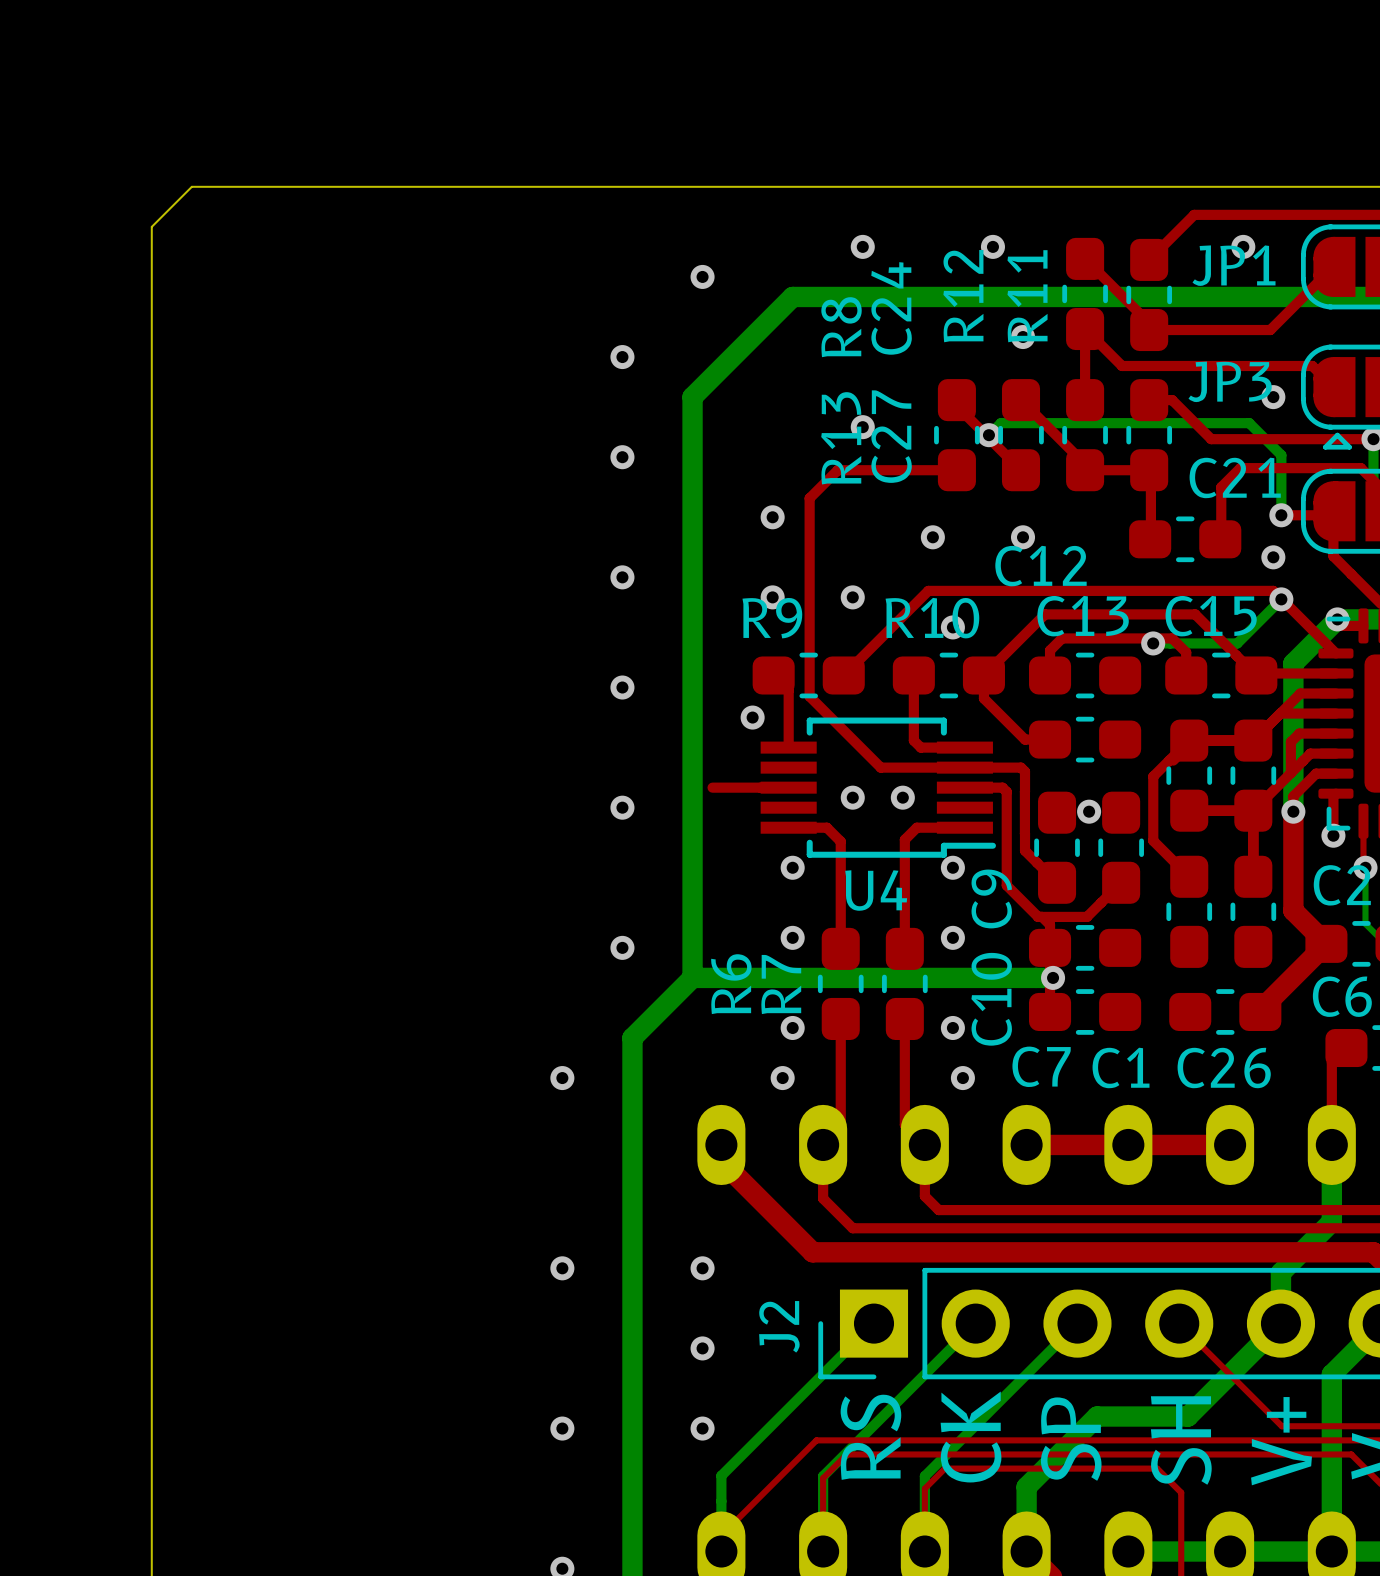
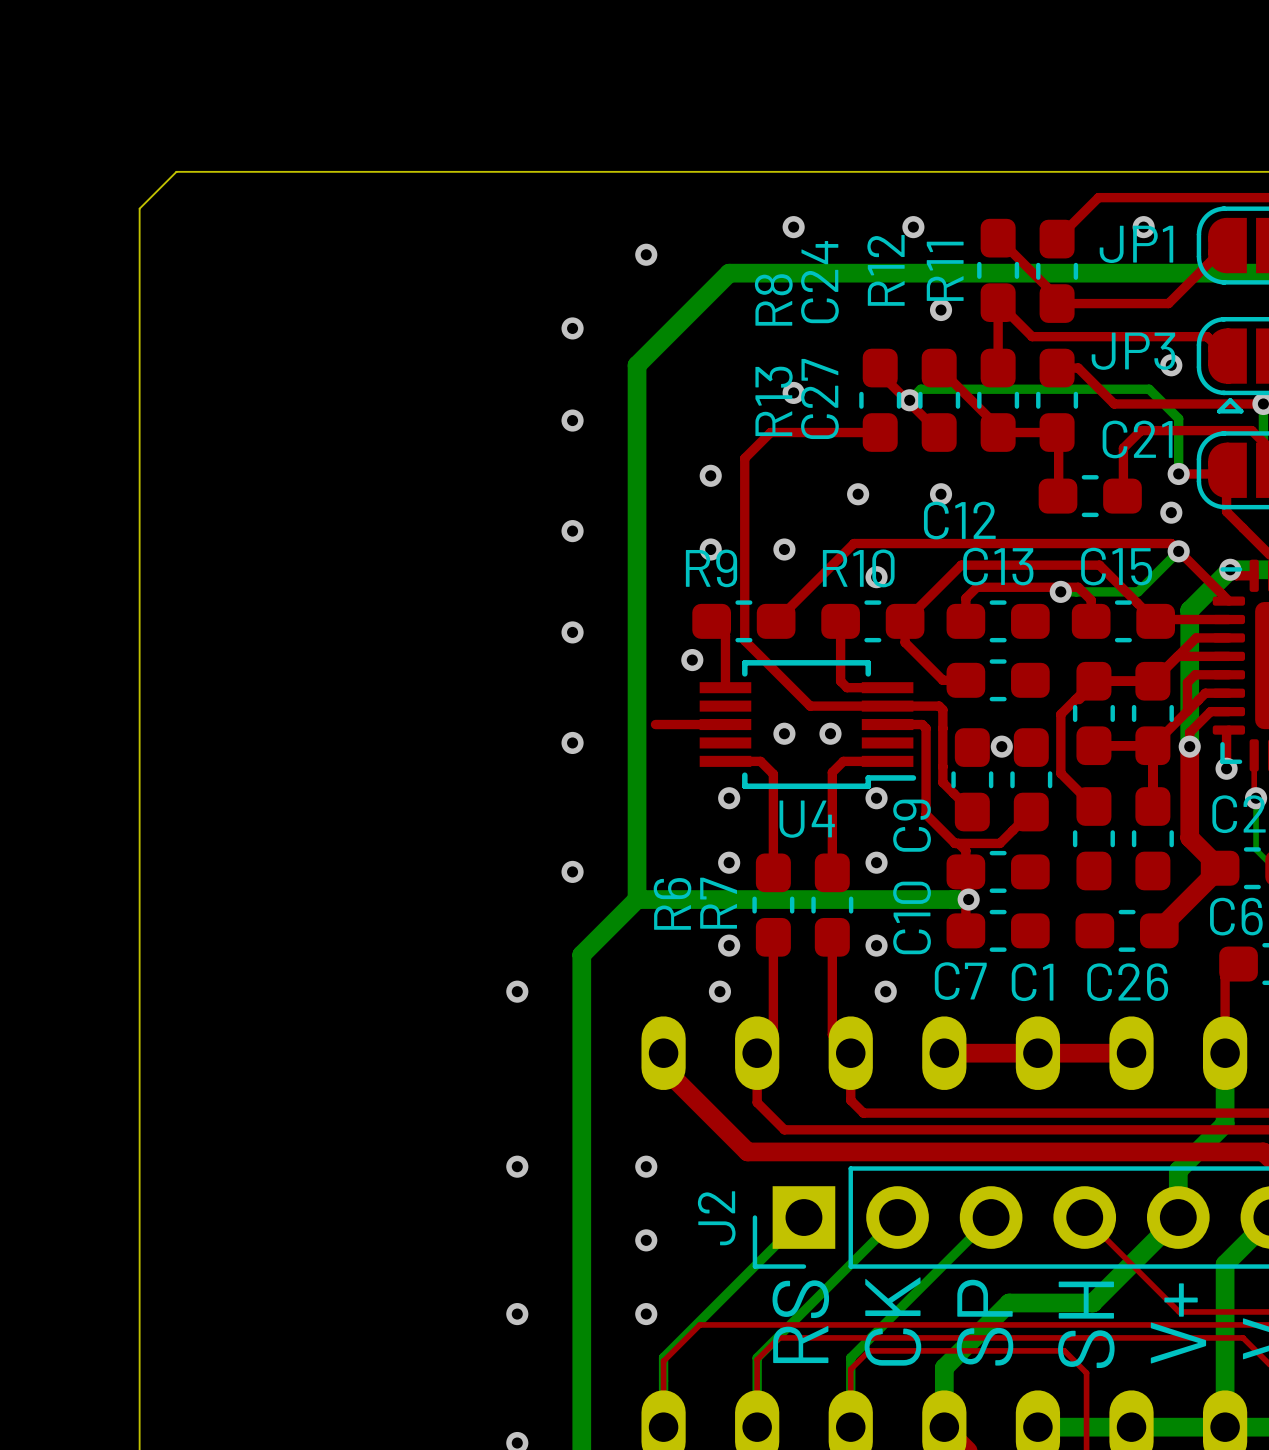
top track: (816, 1440) (721, 1535) -> (751, 1324) (699, 1324) (663, 1361) (663, 1412)

